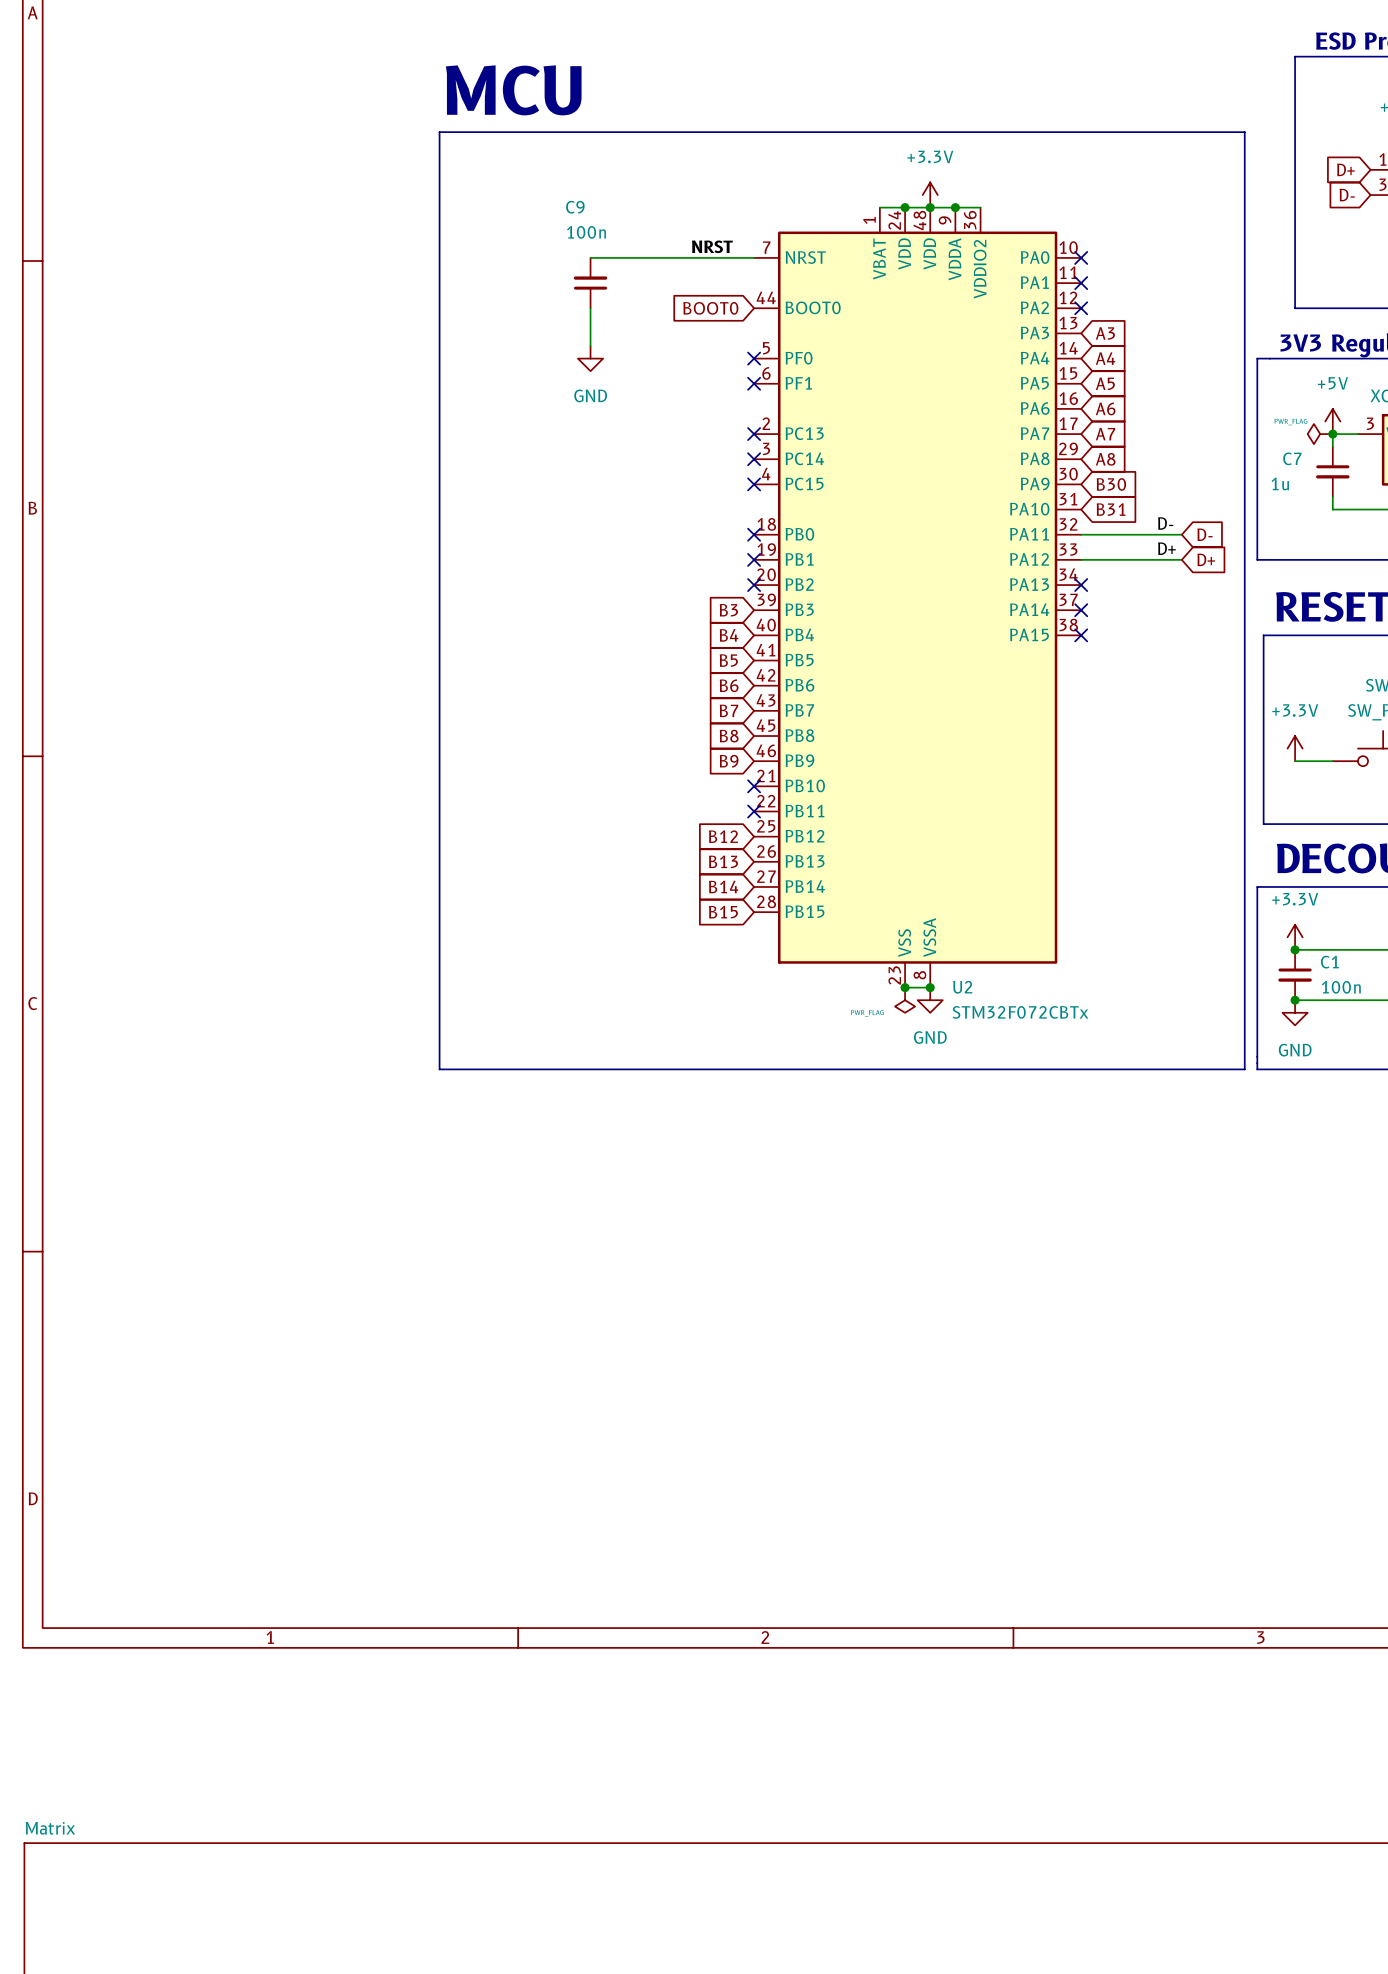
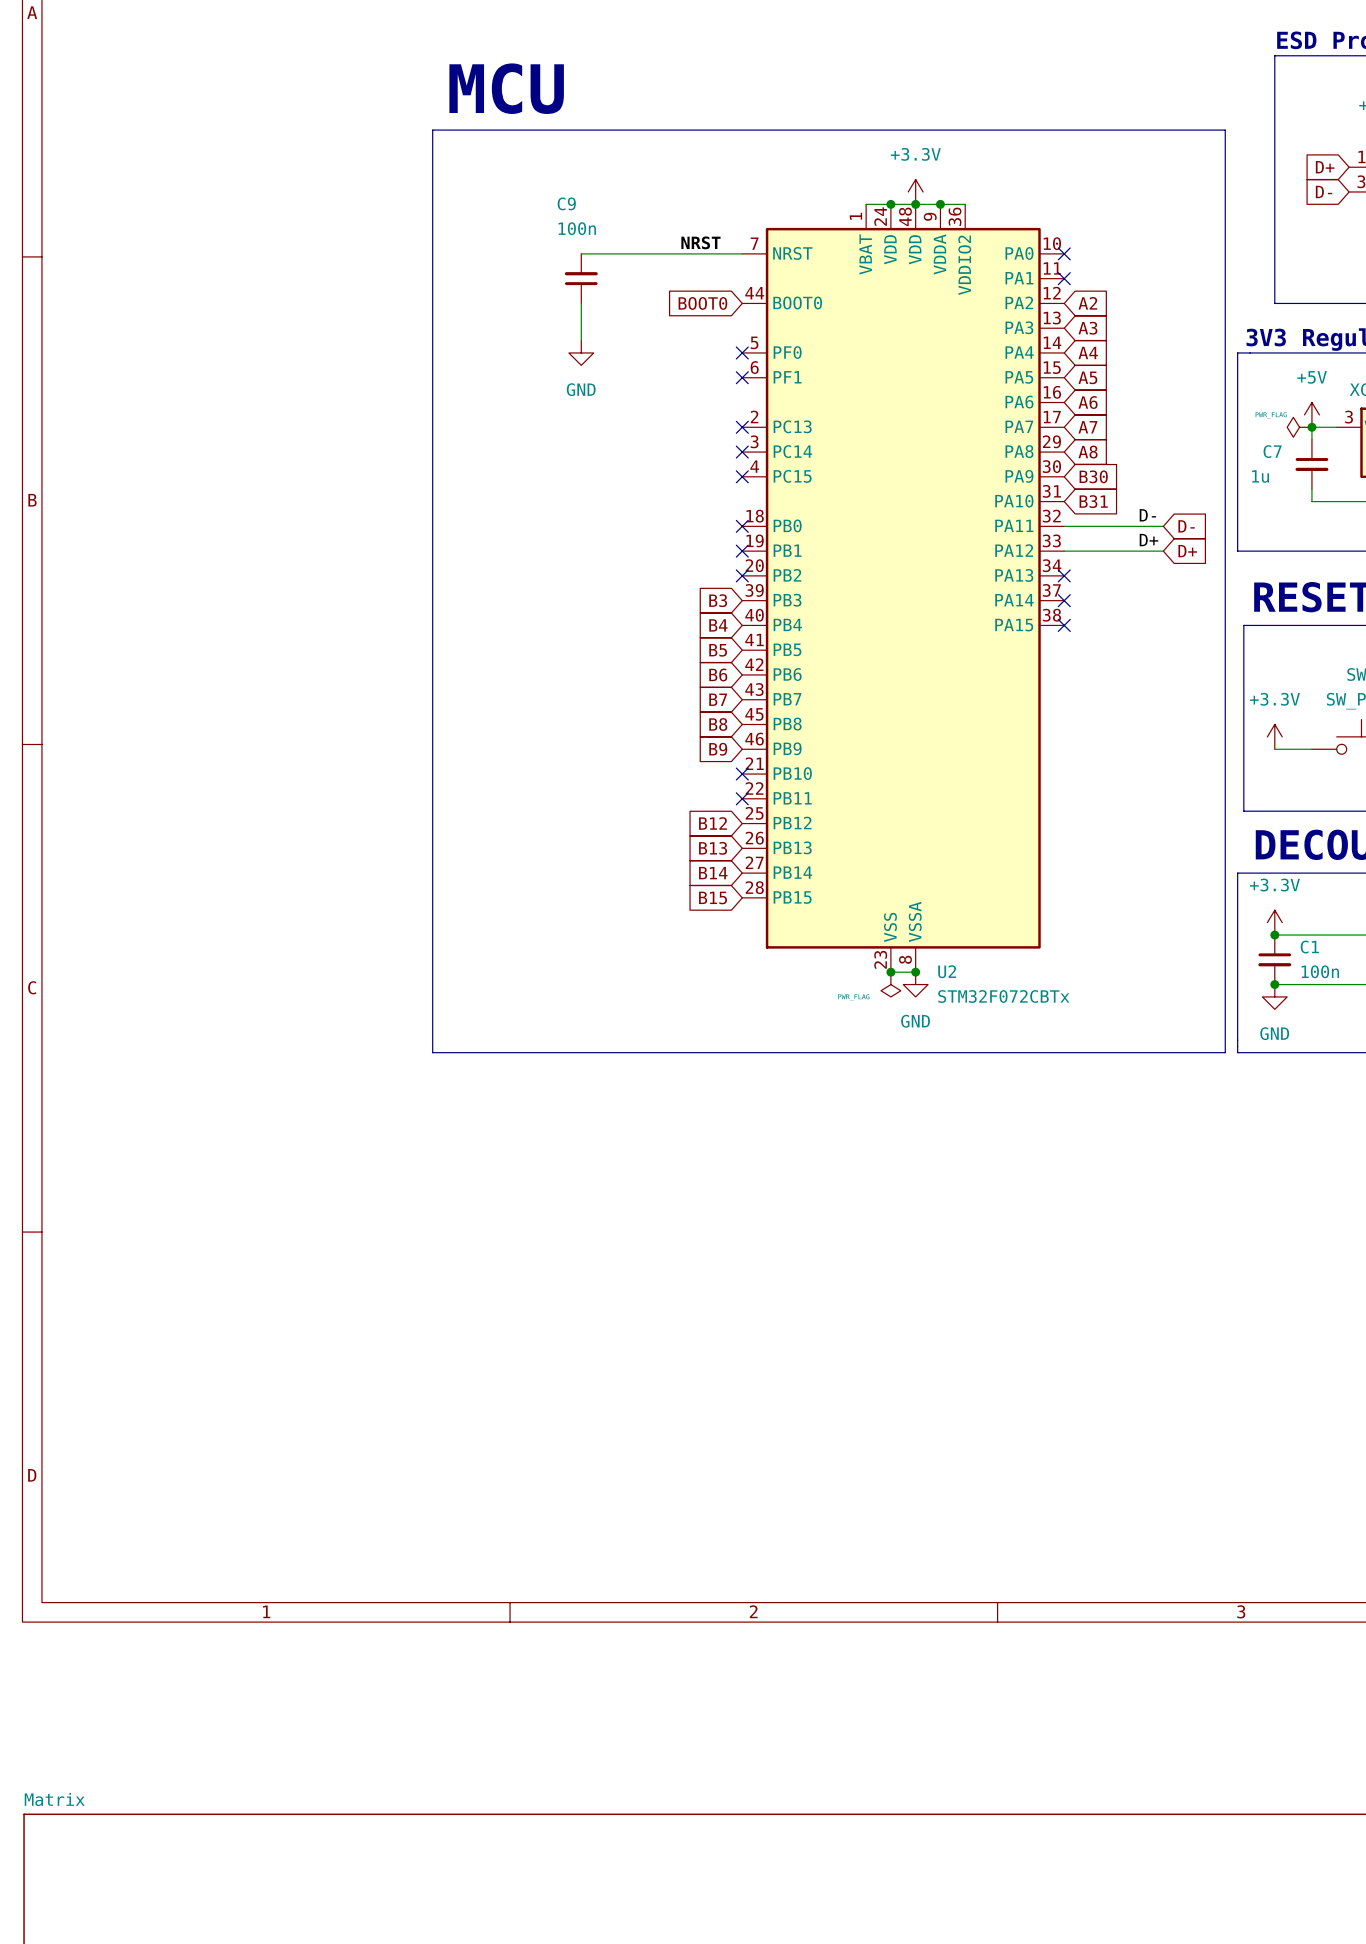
no-connect mark: (1081, 308) -> none
global label: none -> A2 (1087, 303)

